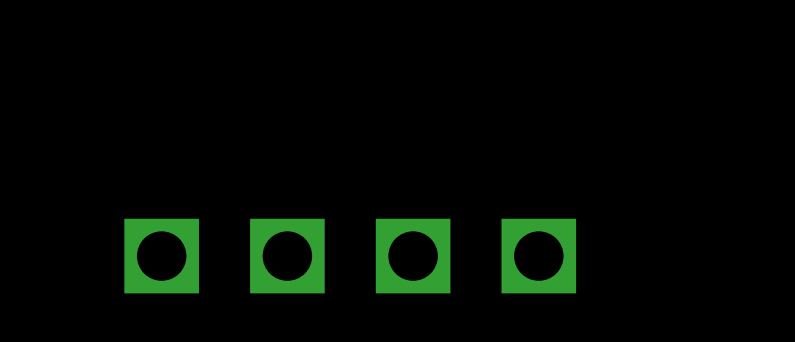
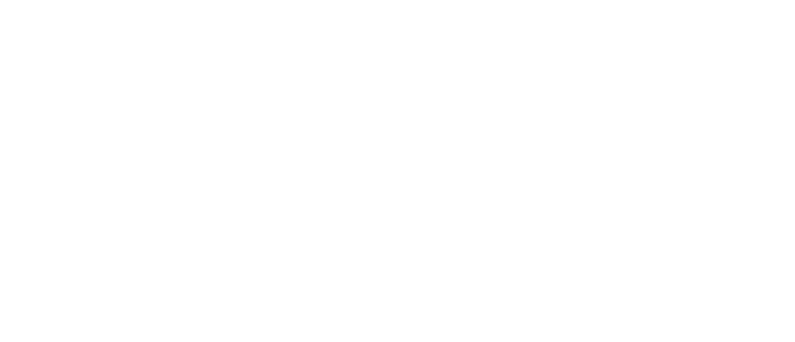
part: (350, 256) -> none

